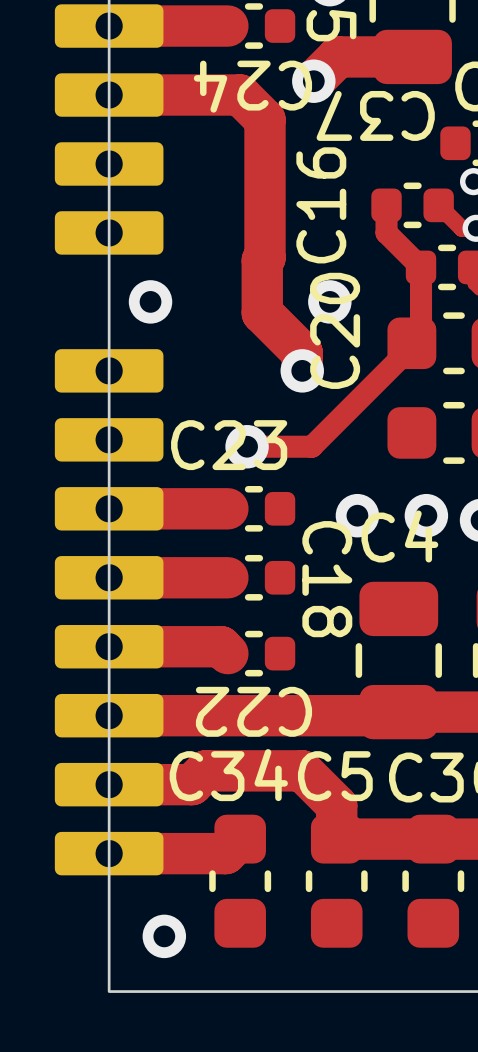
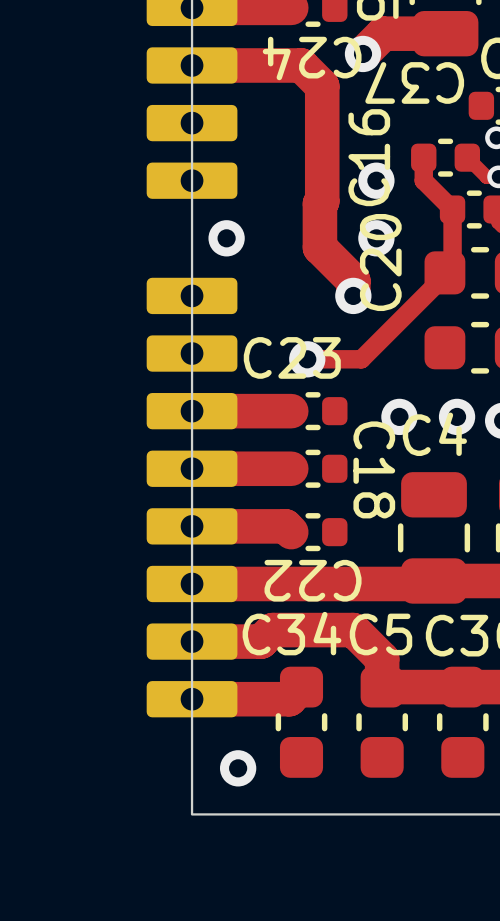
via: none -> (376, 180)

